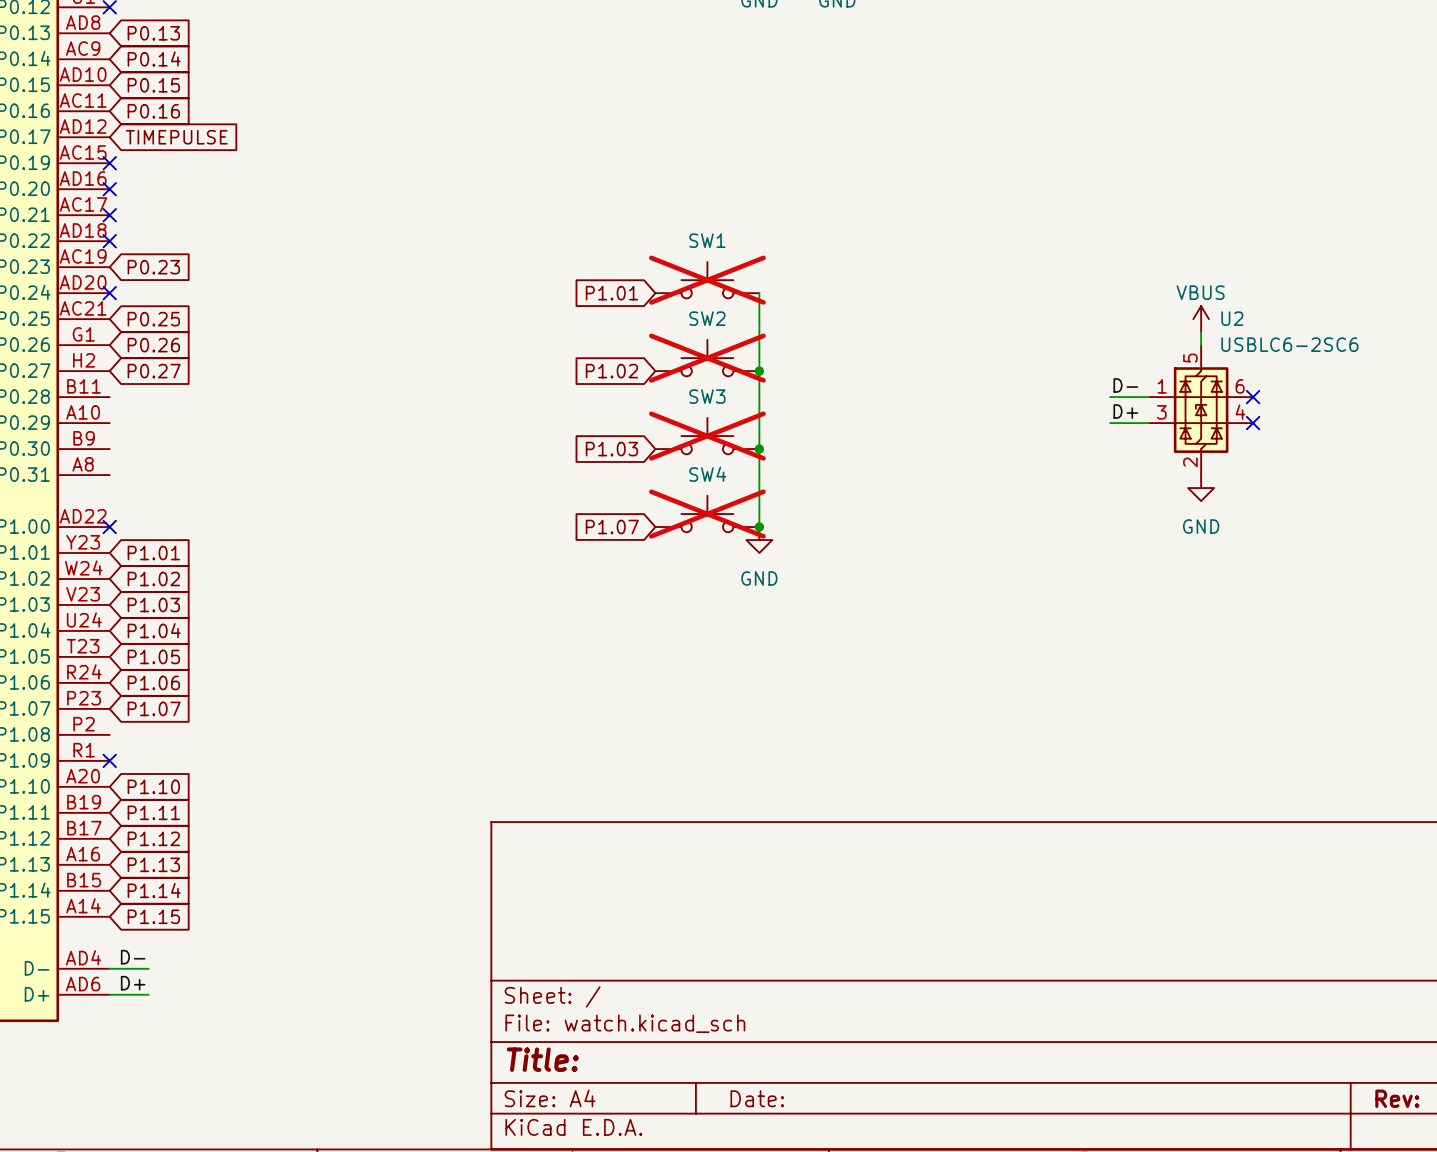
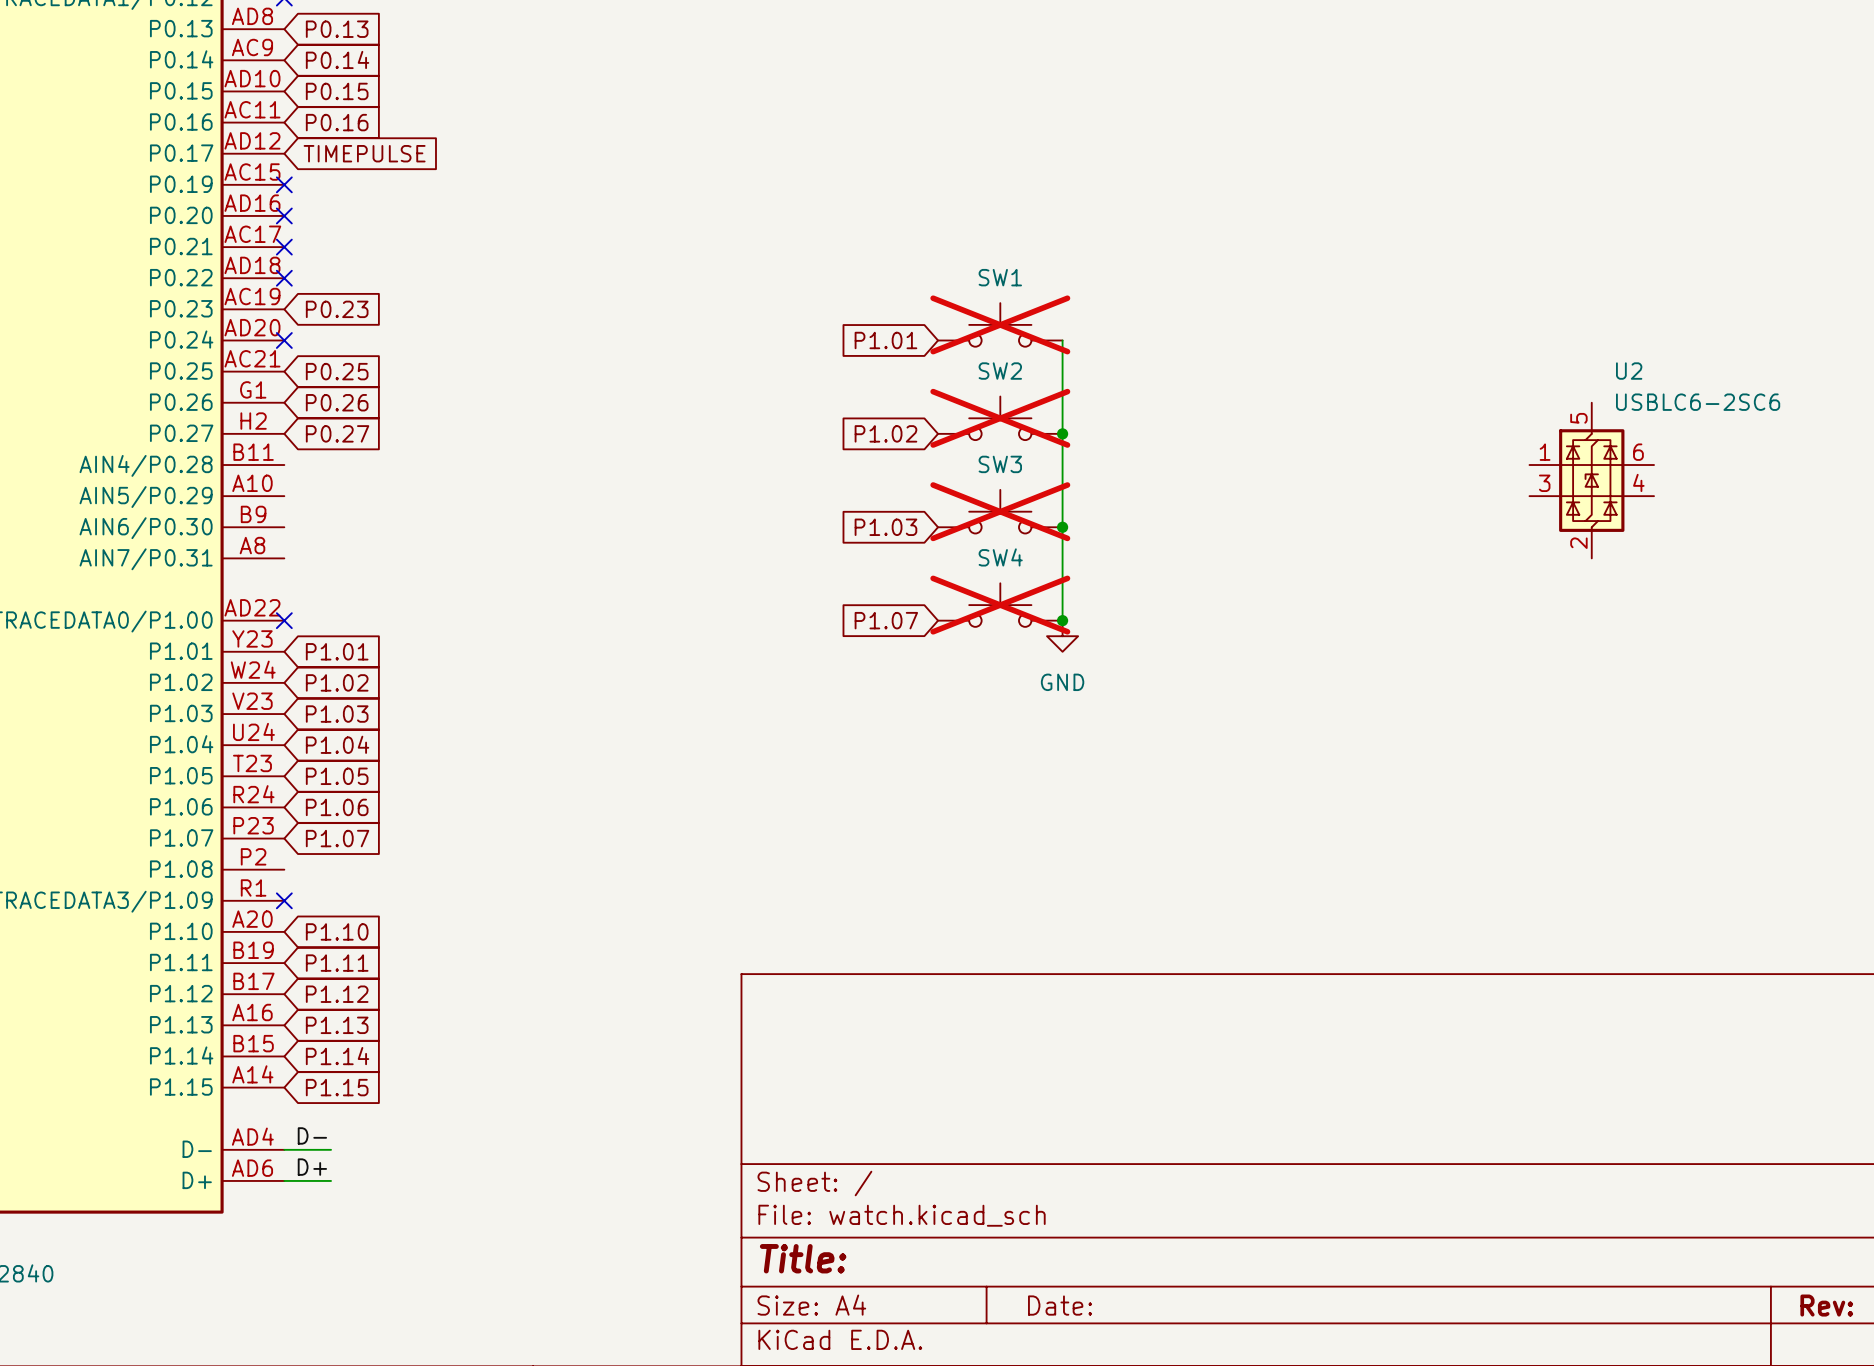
power symbol: VBUS (1201, 319) -> none
wire: (1201, 332) (1201, 345) -> none
label: D- (1125, 385) -> none
wire: (1110, 397) (1149, 397) -> none
no-connect mark: (1253, 397) -> none
label: D+ (1125, 411) -> none
wire: (1110, 423) (1149, 423) -> none
no-connect mark: (1253, 423) -> none
power symbol: GND (1201, 488) -> none

